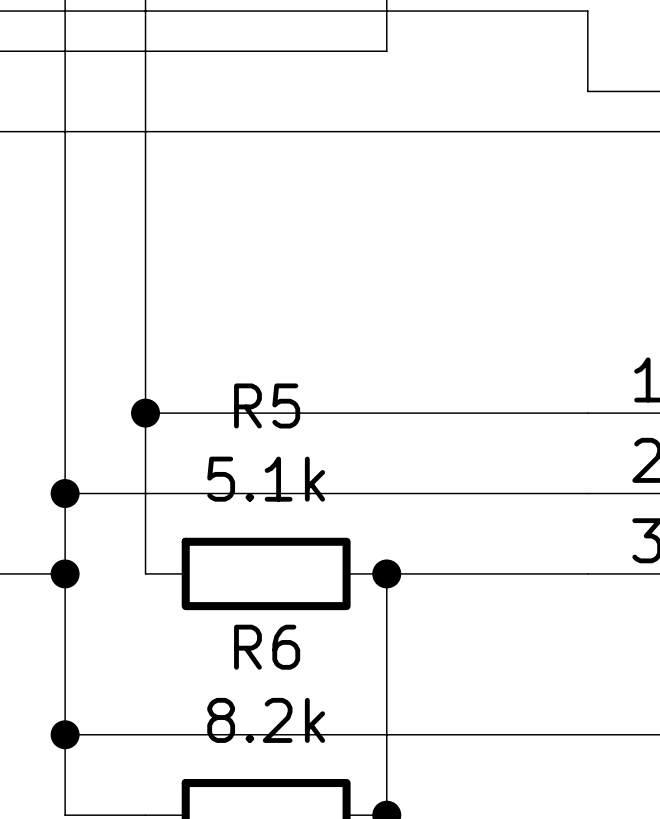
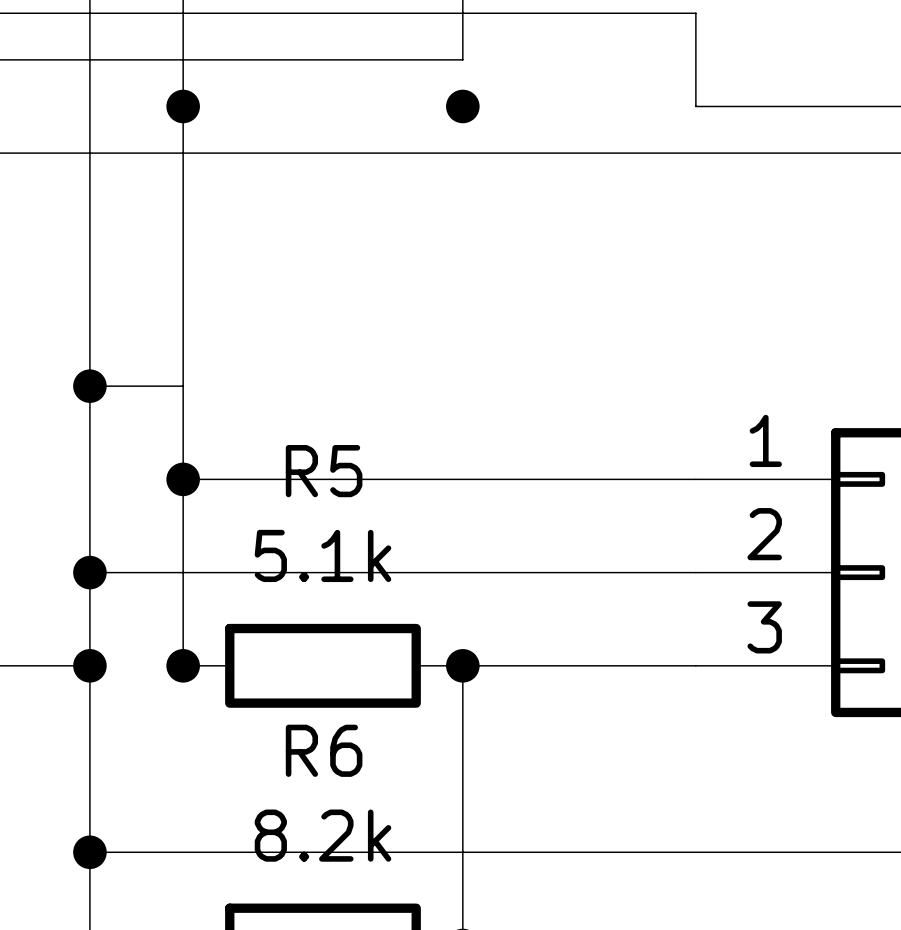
junction: none -> (183, 106)
junction: none -> (462, 106)
wire: none -> (89, 386) (183, 386)
junction: none -> (89, 386)
junction: none -> (183, 665)

